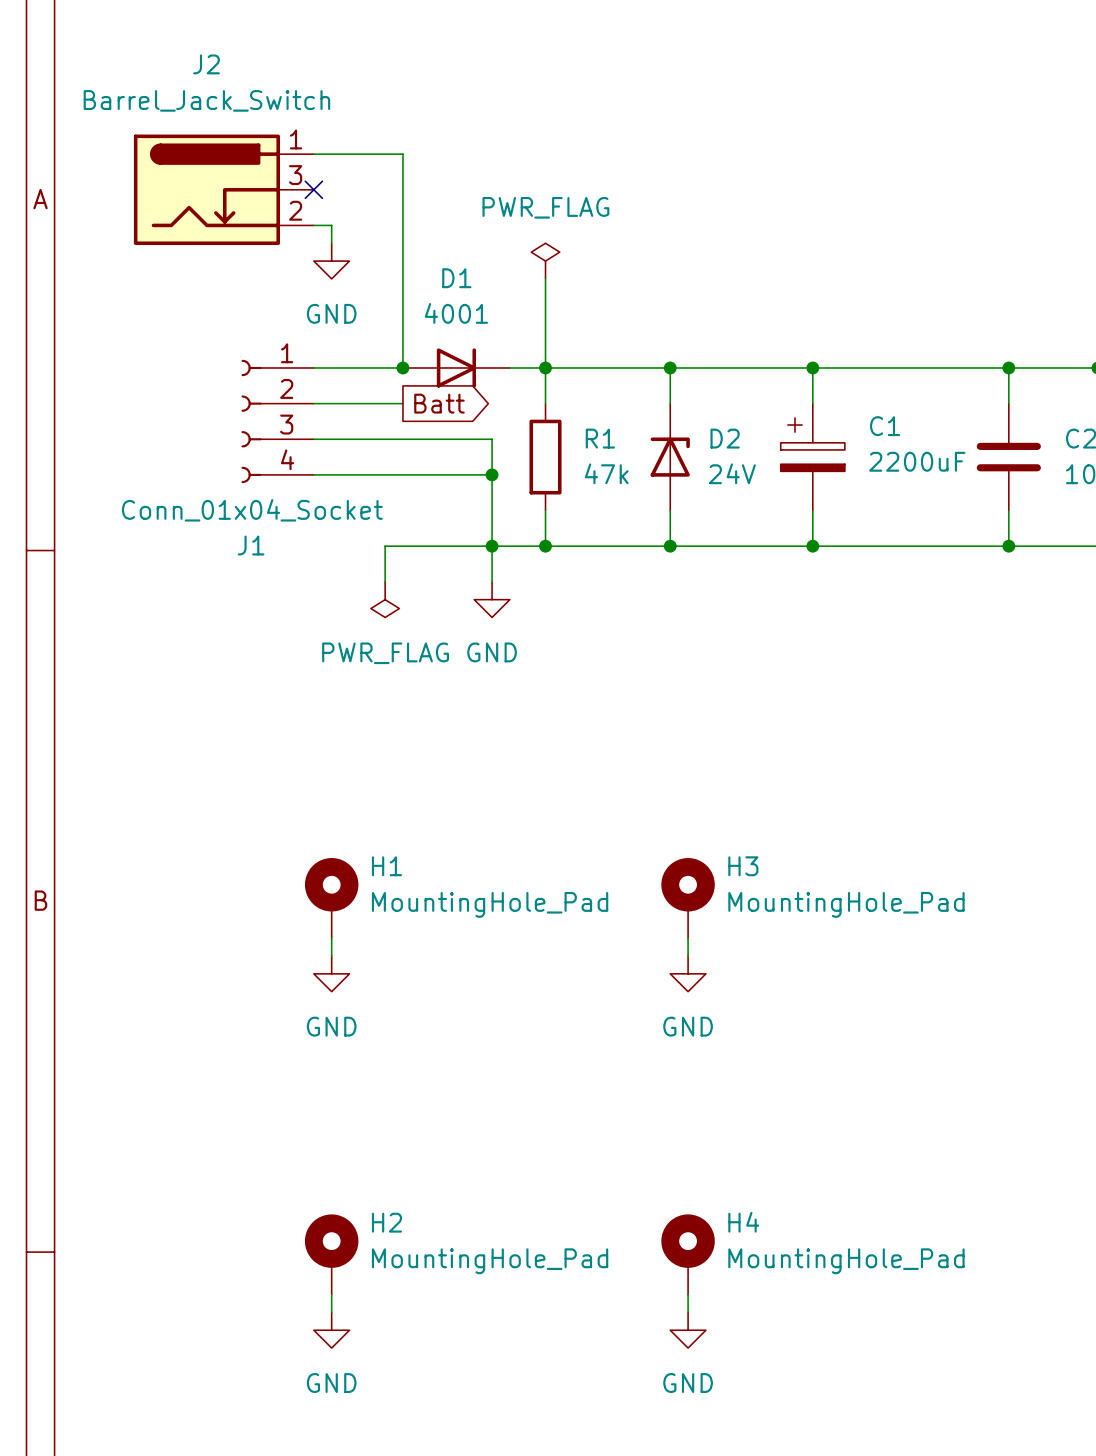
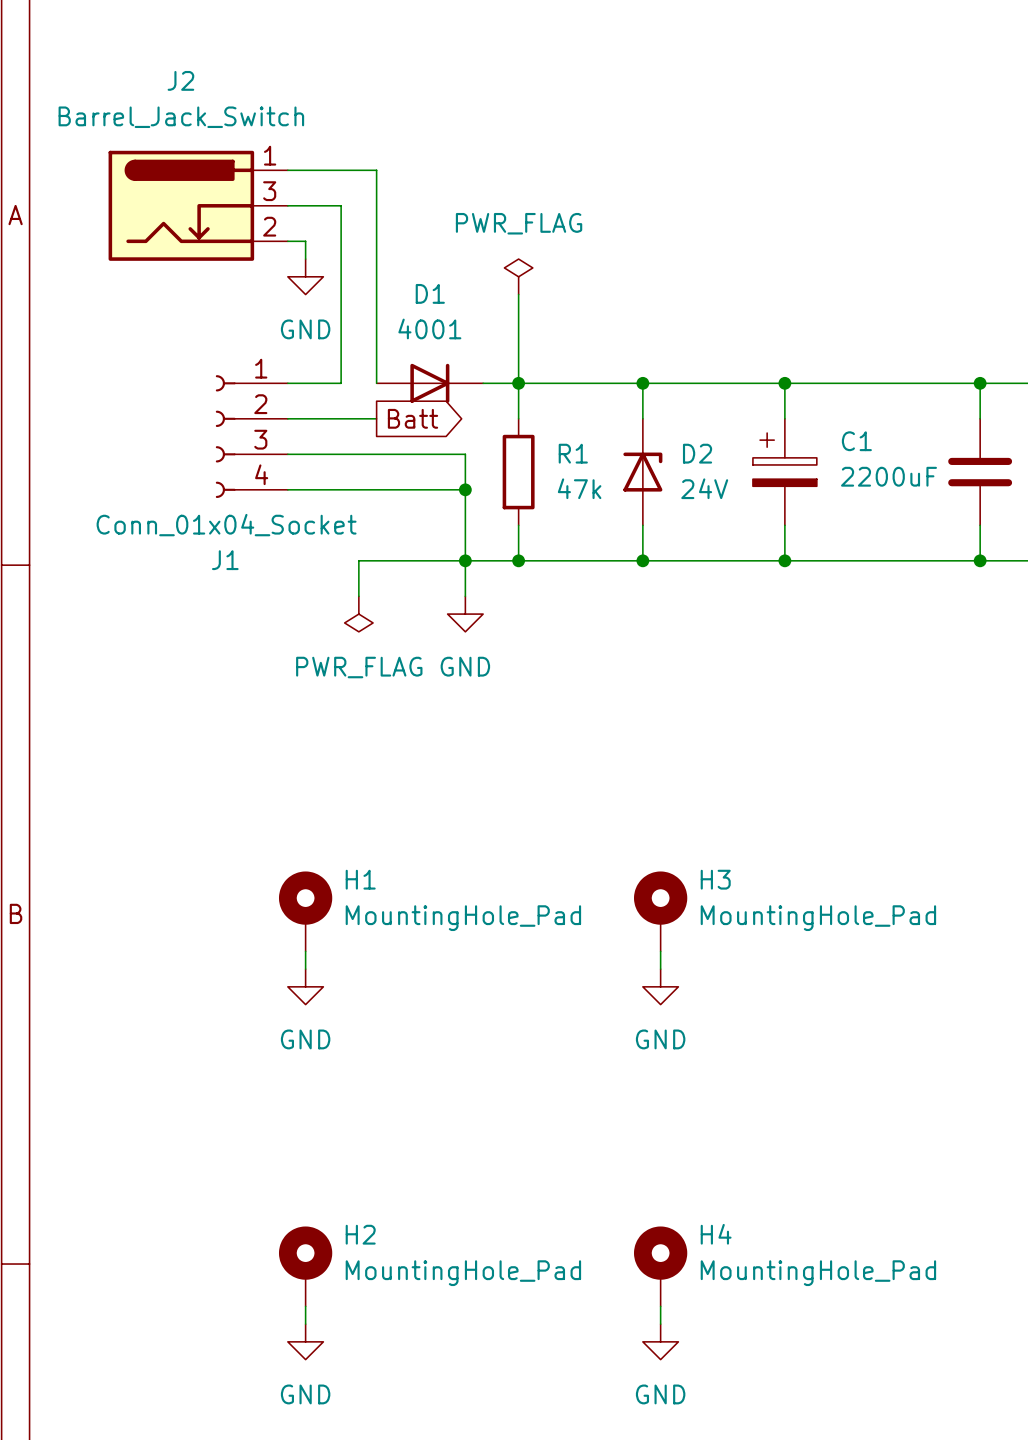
no-connect mark: (313, 189) -> none
wire: (367, 367) (402, 367) -> (341, 383) (341, 205) (287, 205)
junction: (402, 367) -> none

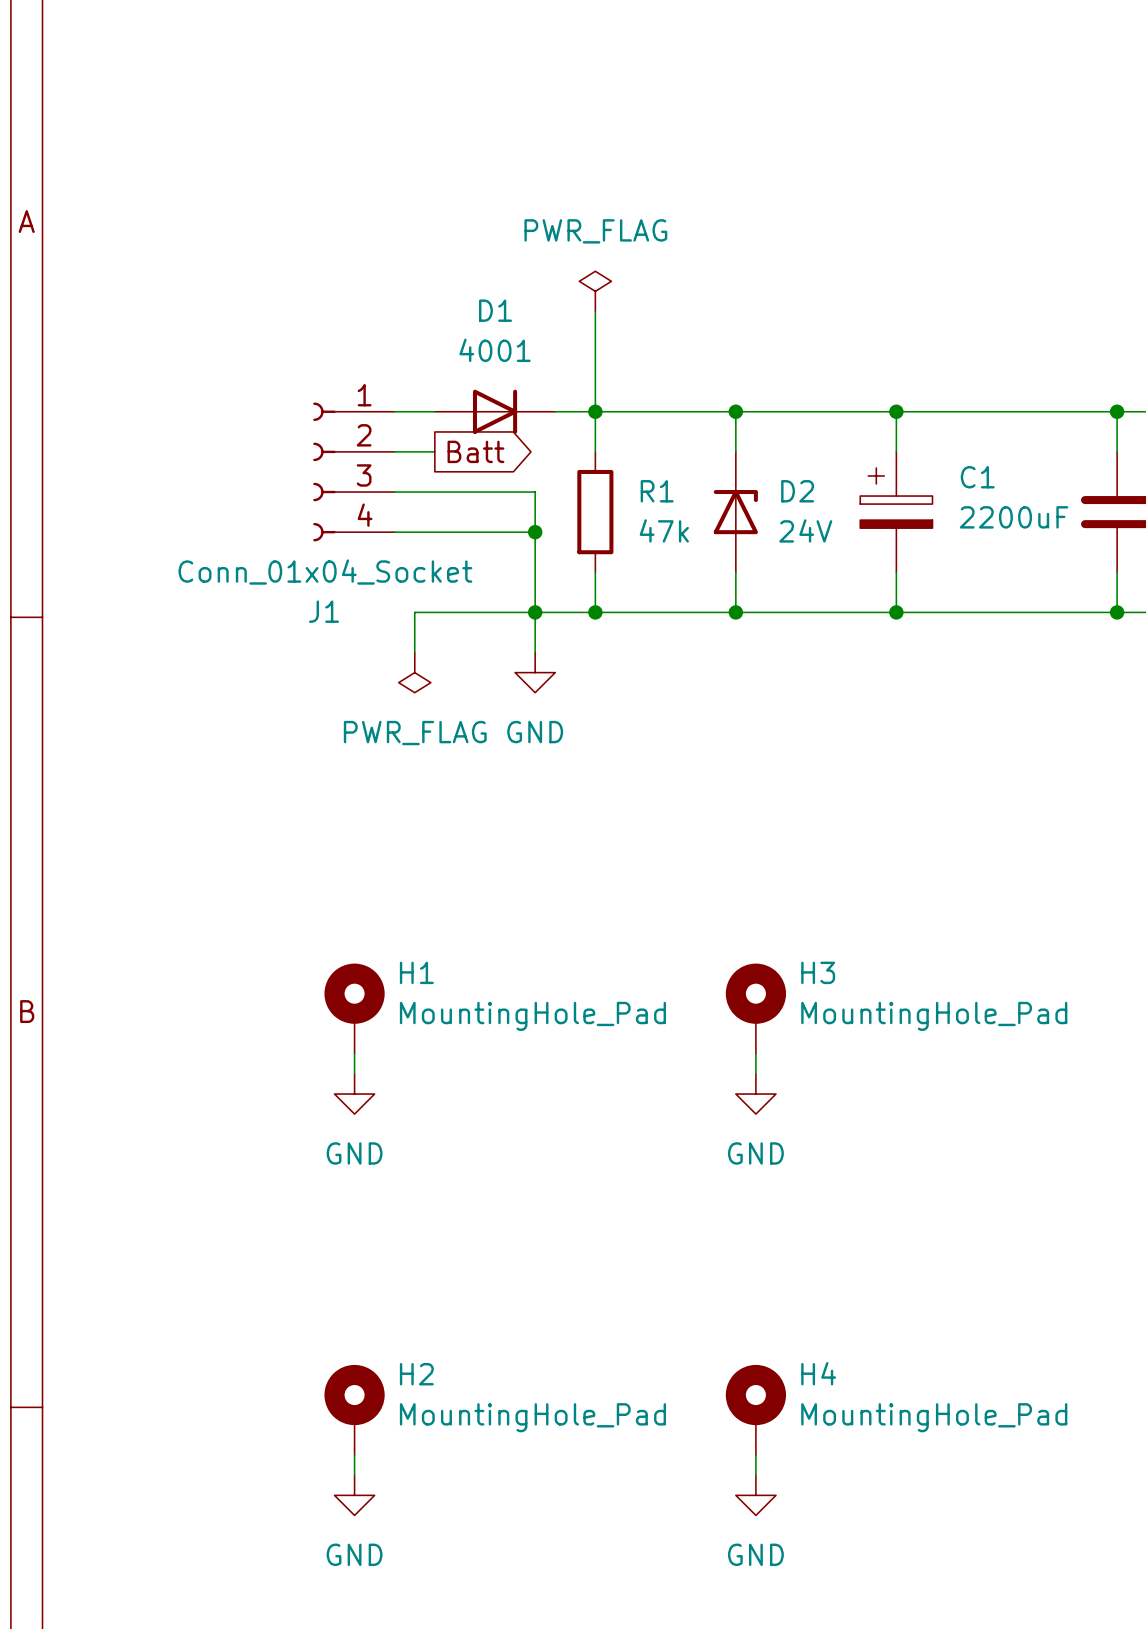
wire: (287, 170) (376, 170) (376, 383) -> (394, 411) (434, 411)
J2: Barrel_Jack_Switch (198, 205) -> none
wire: (287, 205) (341, 205) (341, 383) (287, 383) -> none
wire: (287, 241) (305, 241) (305, 259) -> none
power symbol: GND (305, 276) -> none
J1 position: (251, 436) -> (353, 471)

